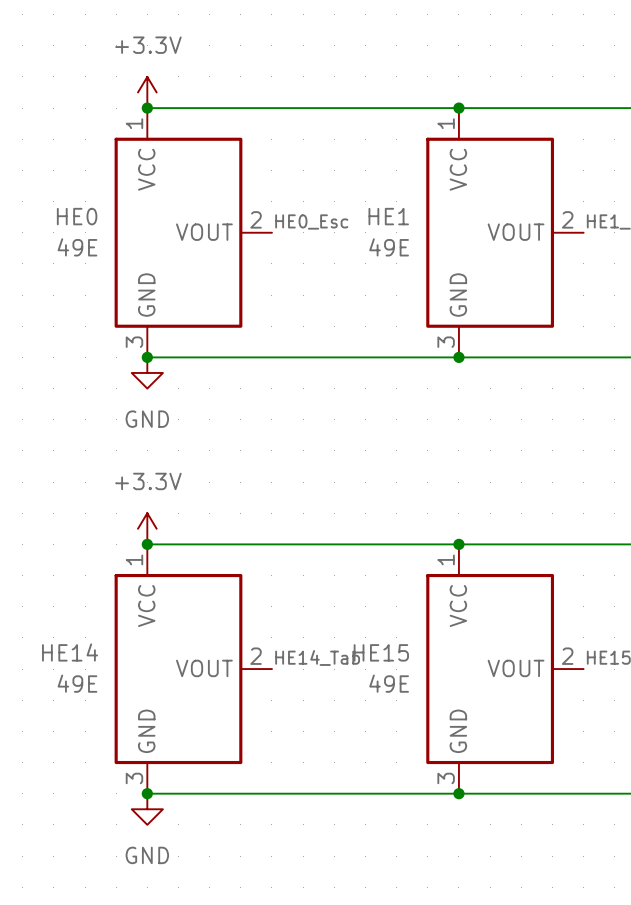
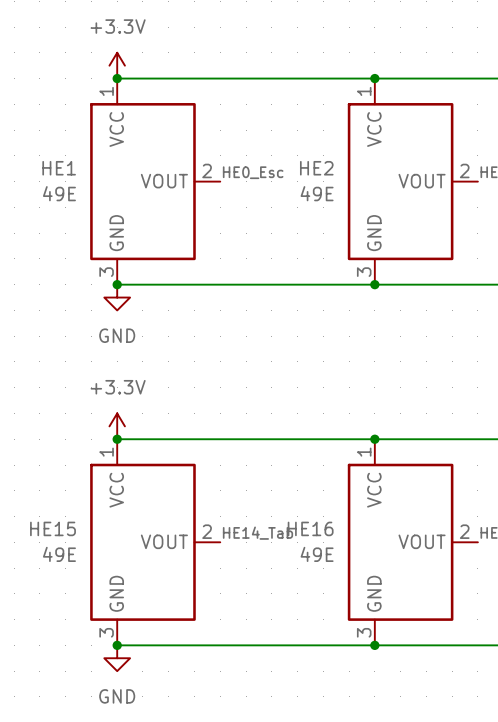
HE0 name: HE0 (77, 216) -> HE1 (59, 168)
HE1 name: HE1 (388, 216) -> HE2 (316, 168)
HE14 name: HE14 (70, 652) -> HE15 (53, 528)
HE15 name: HE15 (381, 652) -> HE16 (310, 528)

